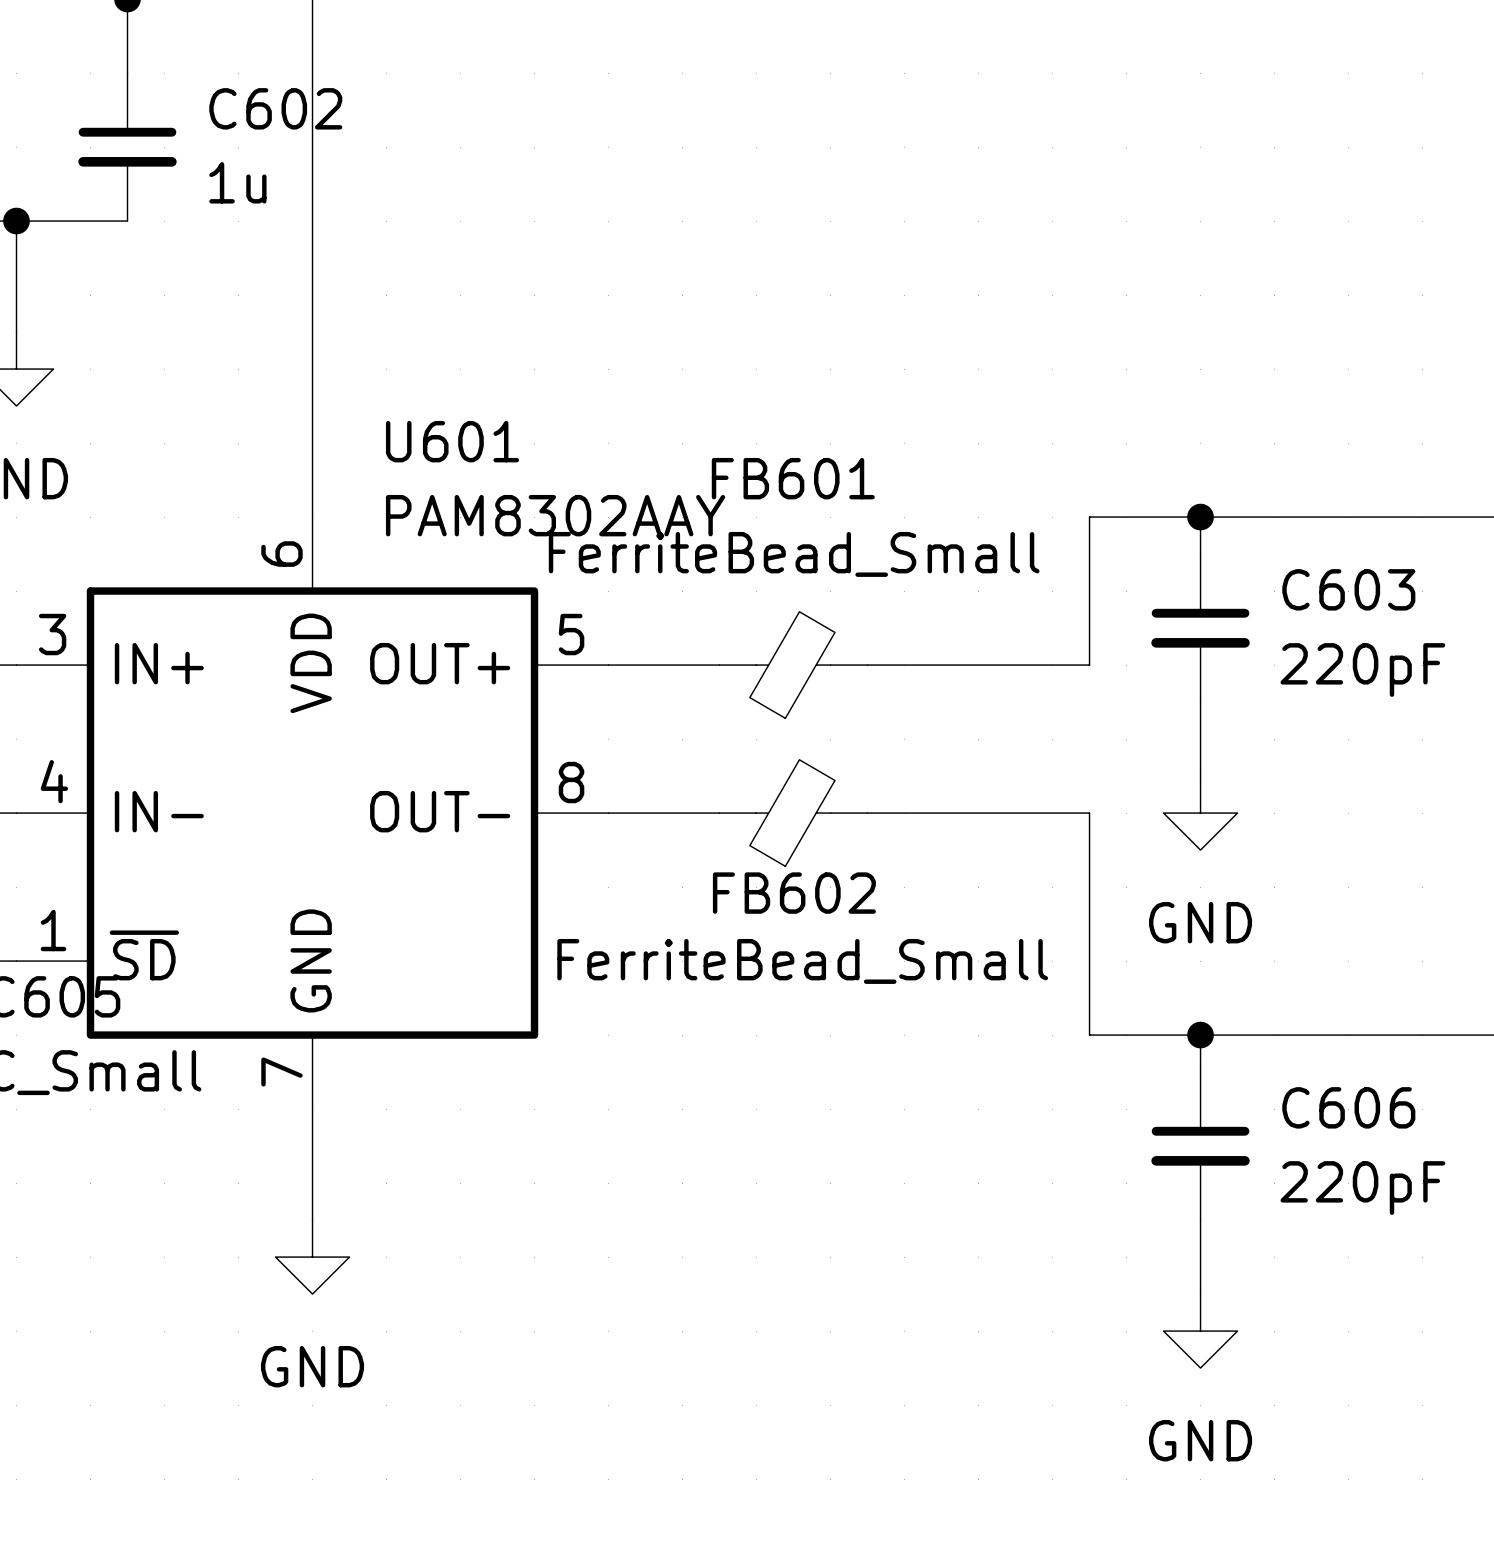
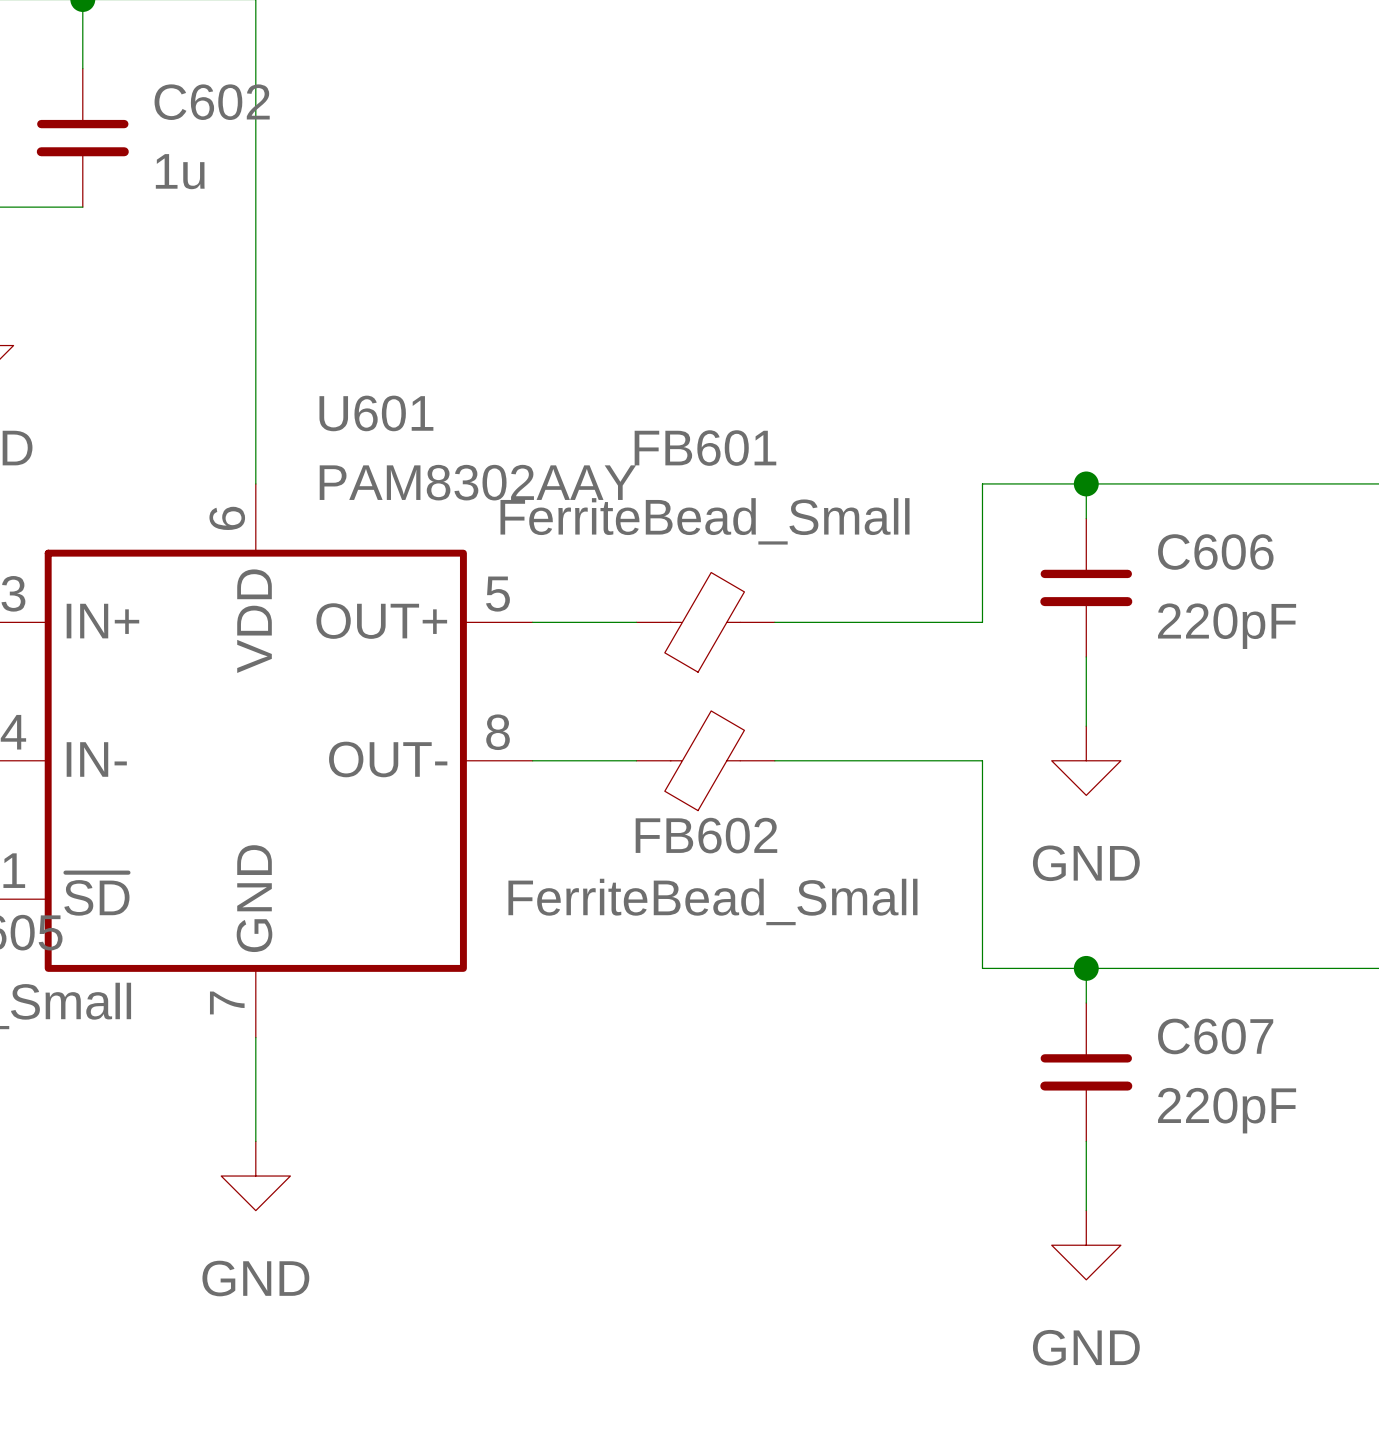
C603 name: C603 (1348, 589) -> C606 (1215, 552)
C606 name: C606 (1348, 1107) -> C607 (1215, 1036)

